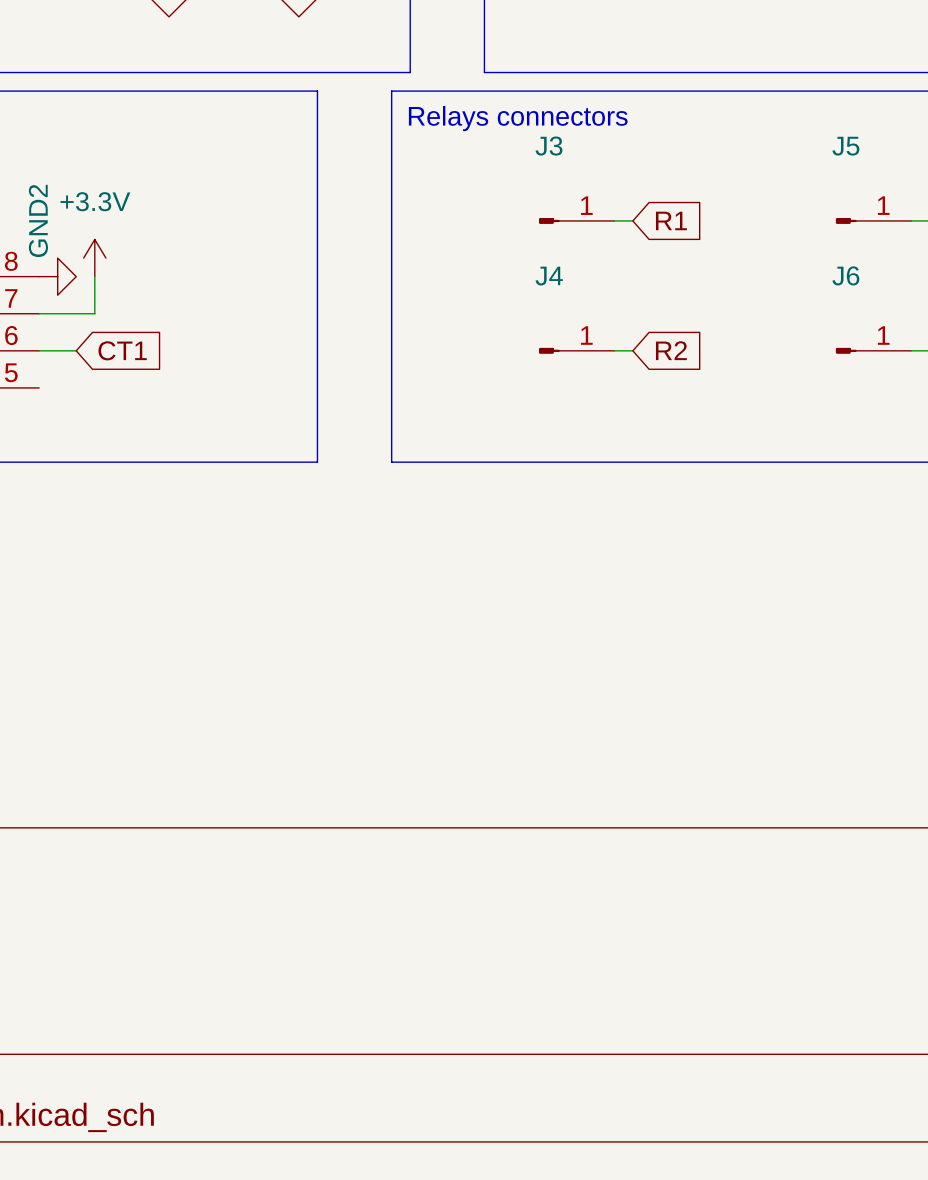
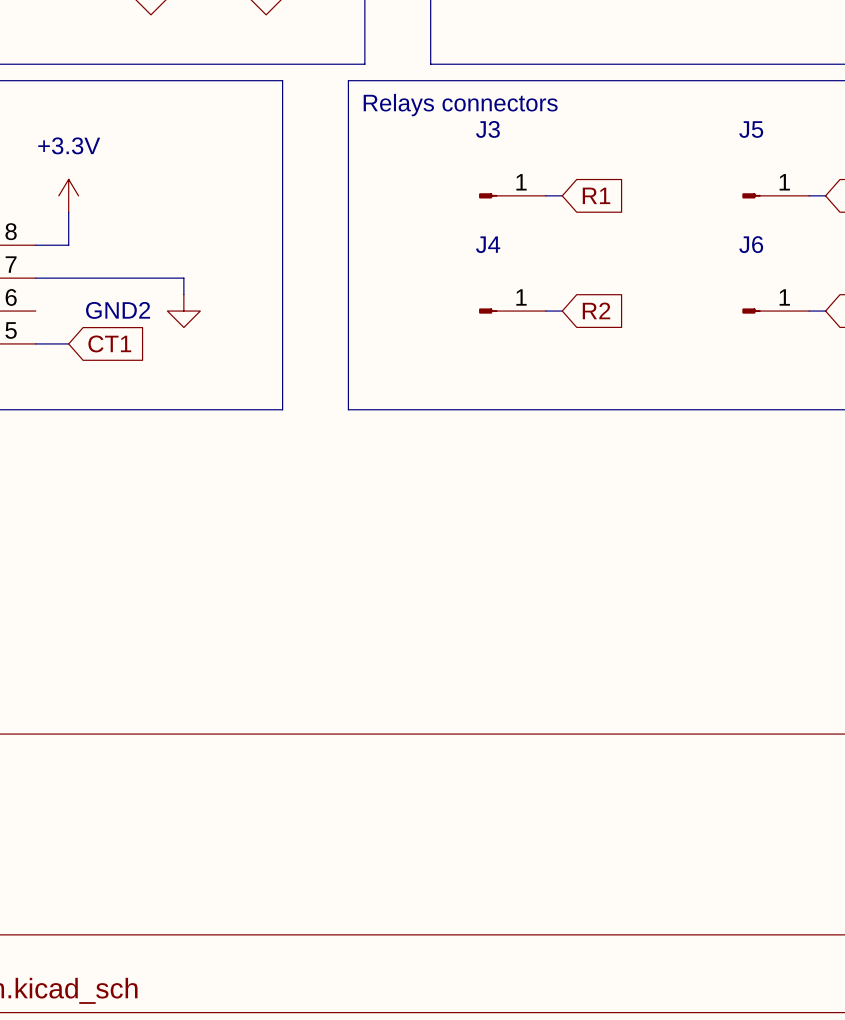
power symbol text position: GND2 (38, 220) -> GND2 (118, 310)
wire: none -> (68, 212) (68, 245) (35, 245)
power symbol position: +3.3V (94, 258) -> +3.3V (68, 195)
power symbol rotation: 0° (57, 276) -> 90° clockwise (183, 311)
power symbol position: GND2 (57, 276) -> GND2 (183, 311)
wire: (94, 276) (94, 313) -> (183, 294) (183, 278) (85, 278)
wire: (39, 350) (76, 350) -> (35, 343) (68, 343)
global label position: CT1 (122, 350) -> CT1 (109, 343)

